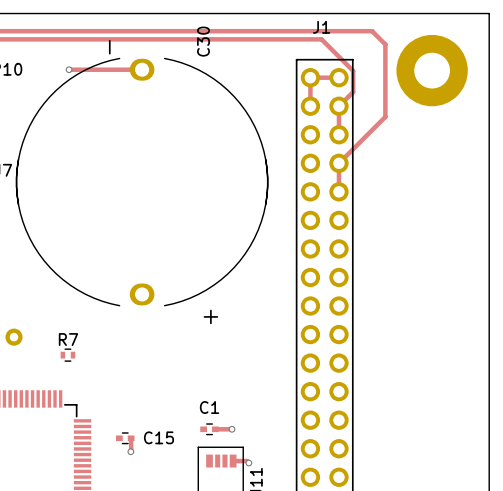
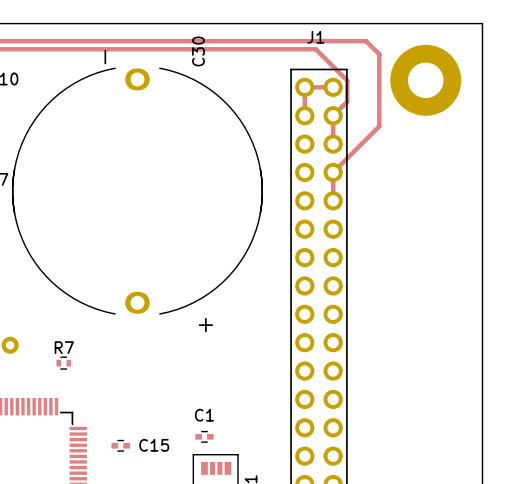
track: (69, 69) (142, 69) -> none
via: (69, 69) -> none
track: (215, 429) (232, 429) -> none
via: (232, 429) -> none
track: (131, 438) (130, 451) -> none
via: (130, 451) -> none
track: (233, 461) (246, 461) (248, 463) -> none
via: (248, 463) -> none

